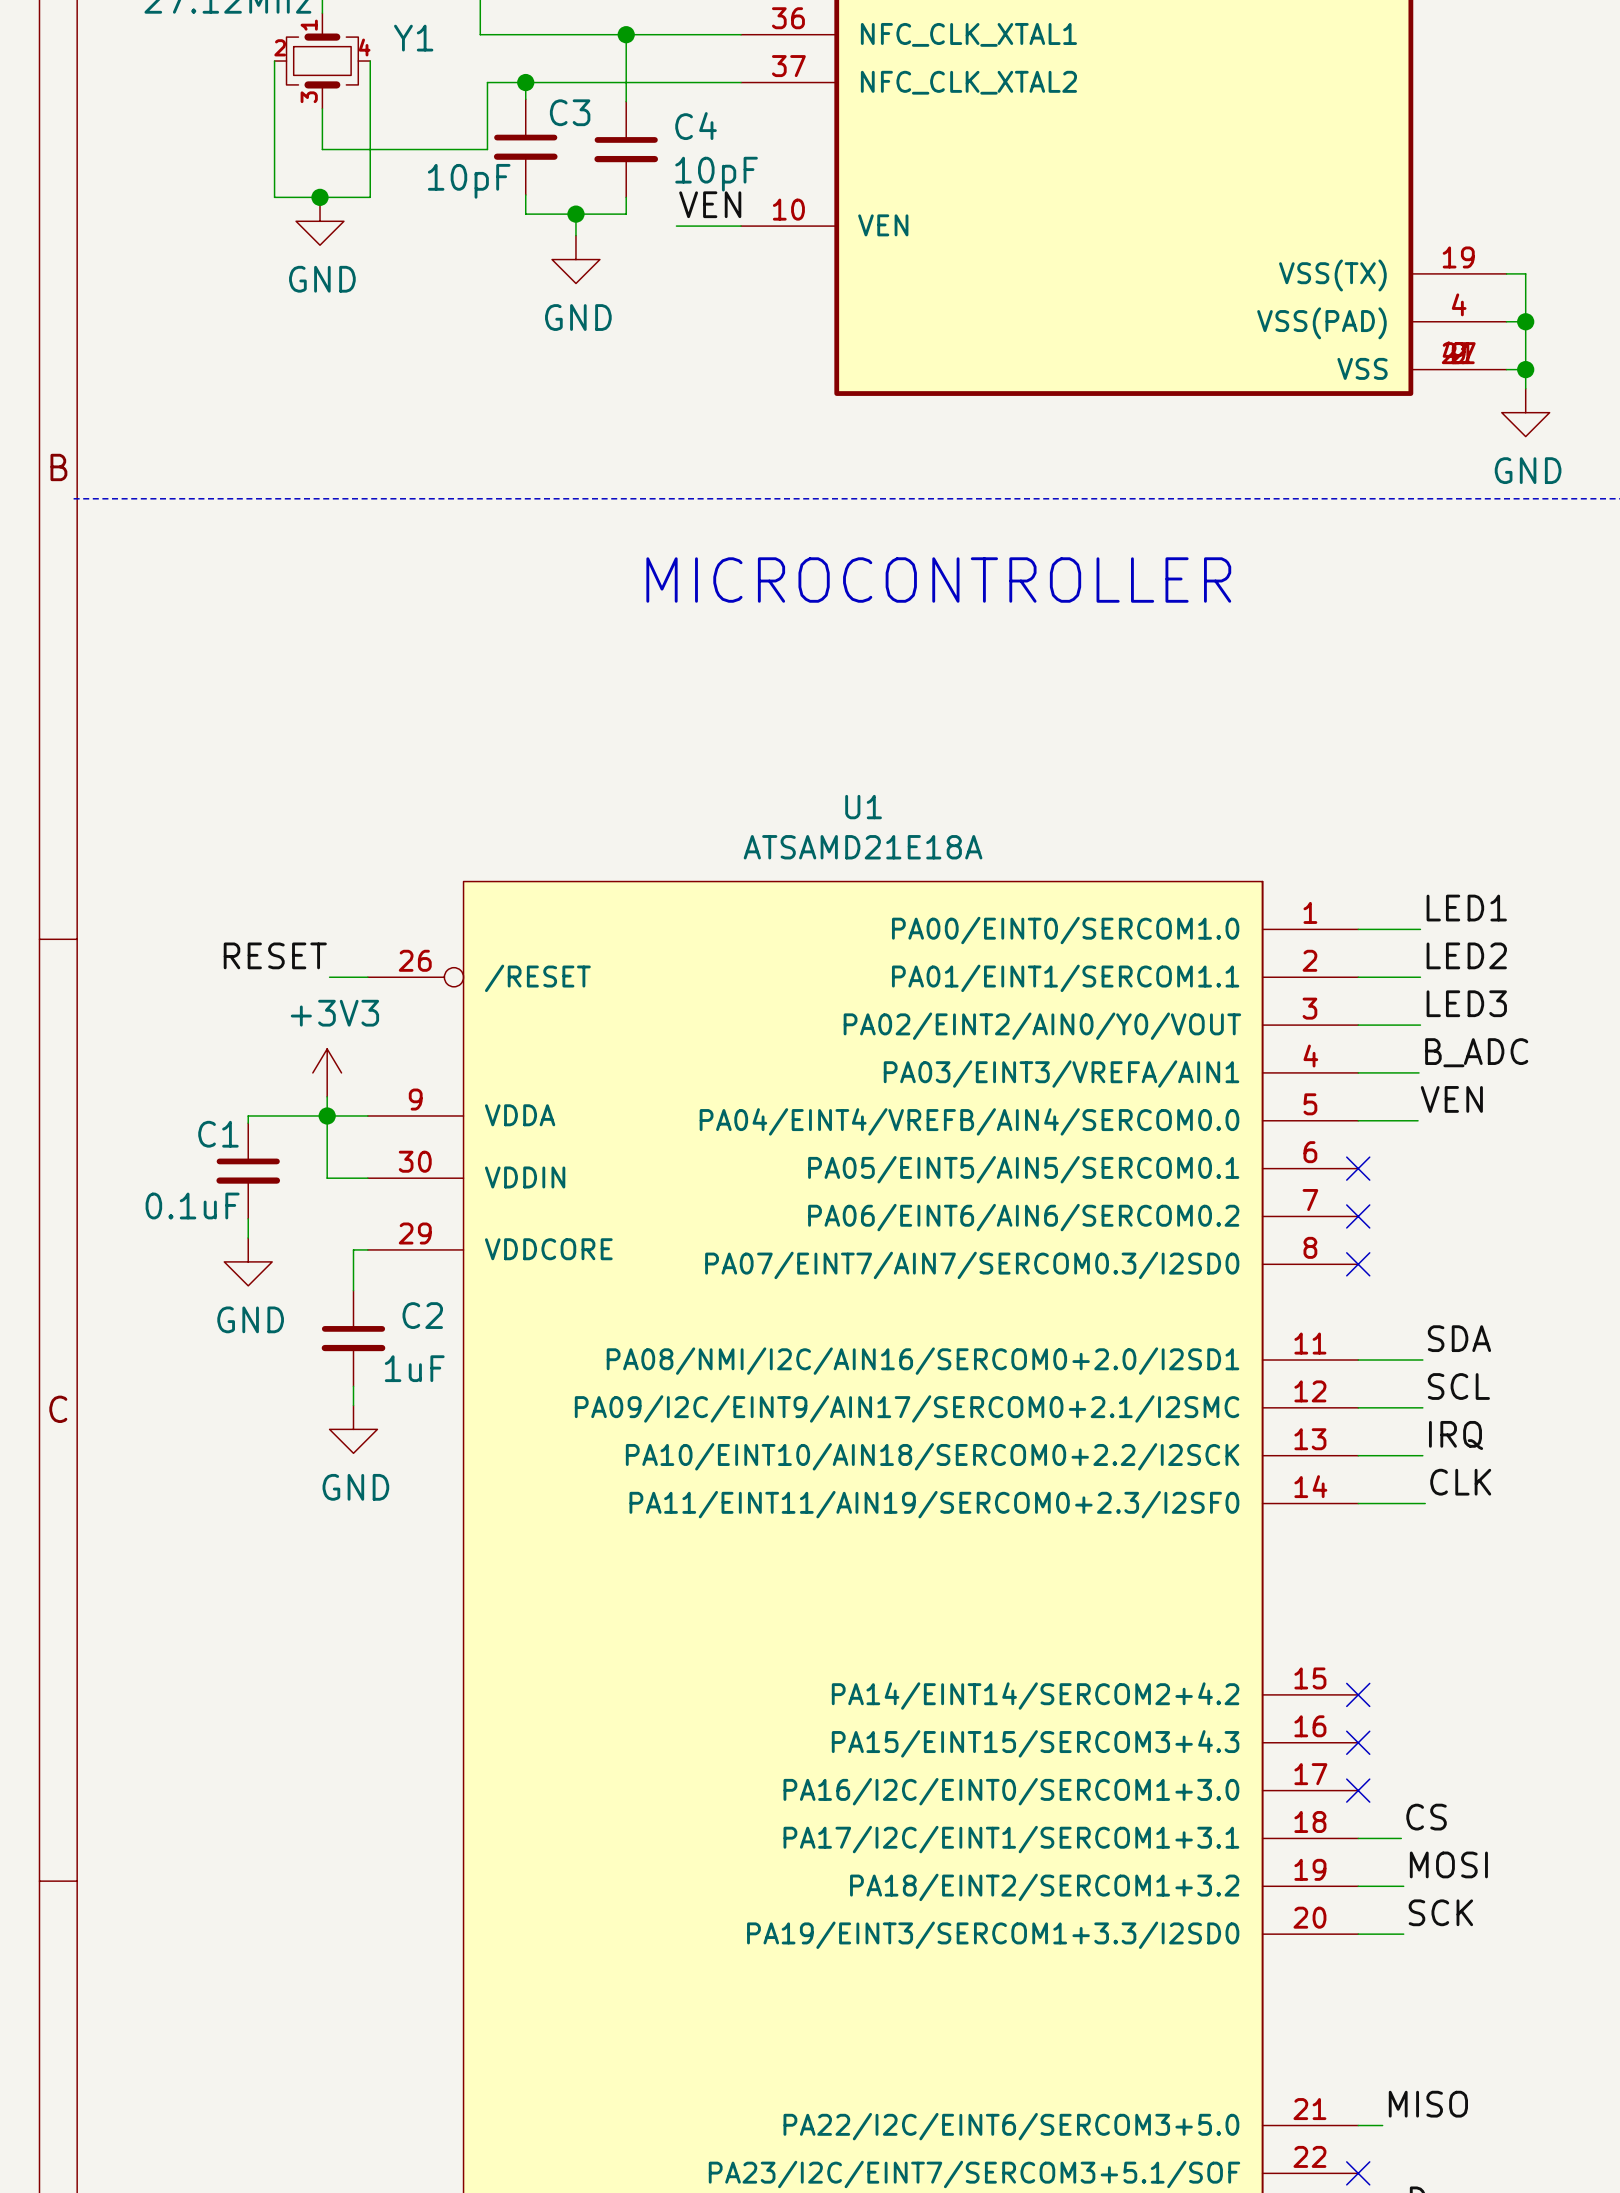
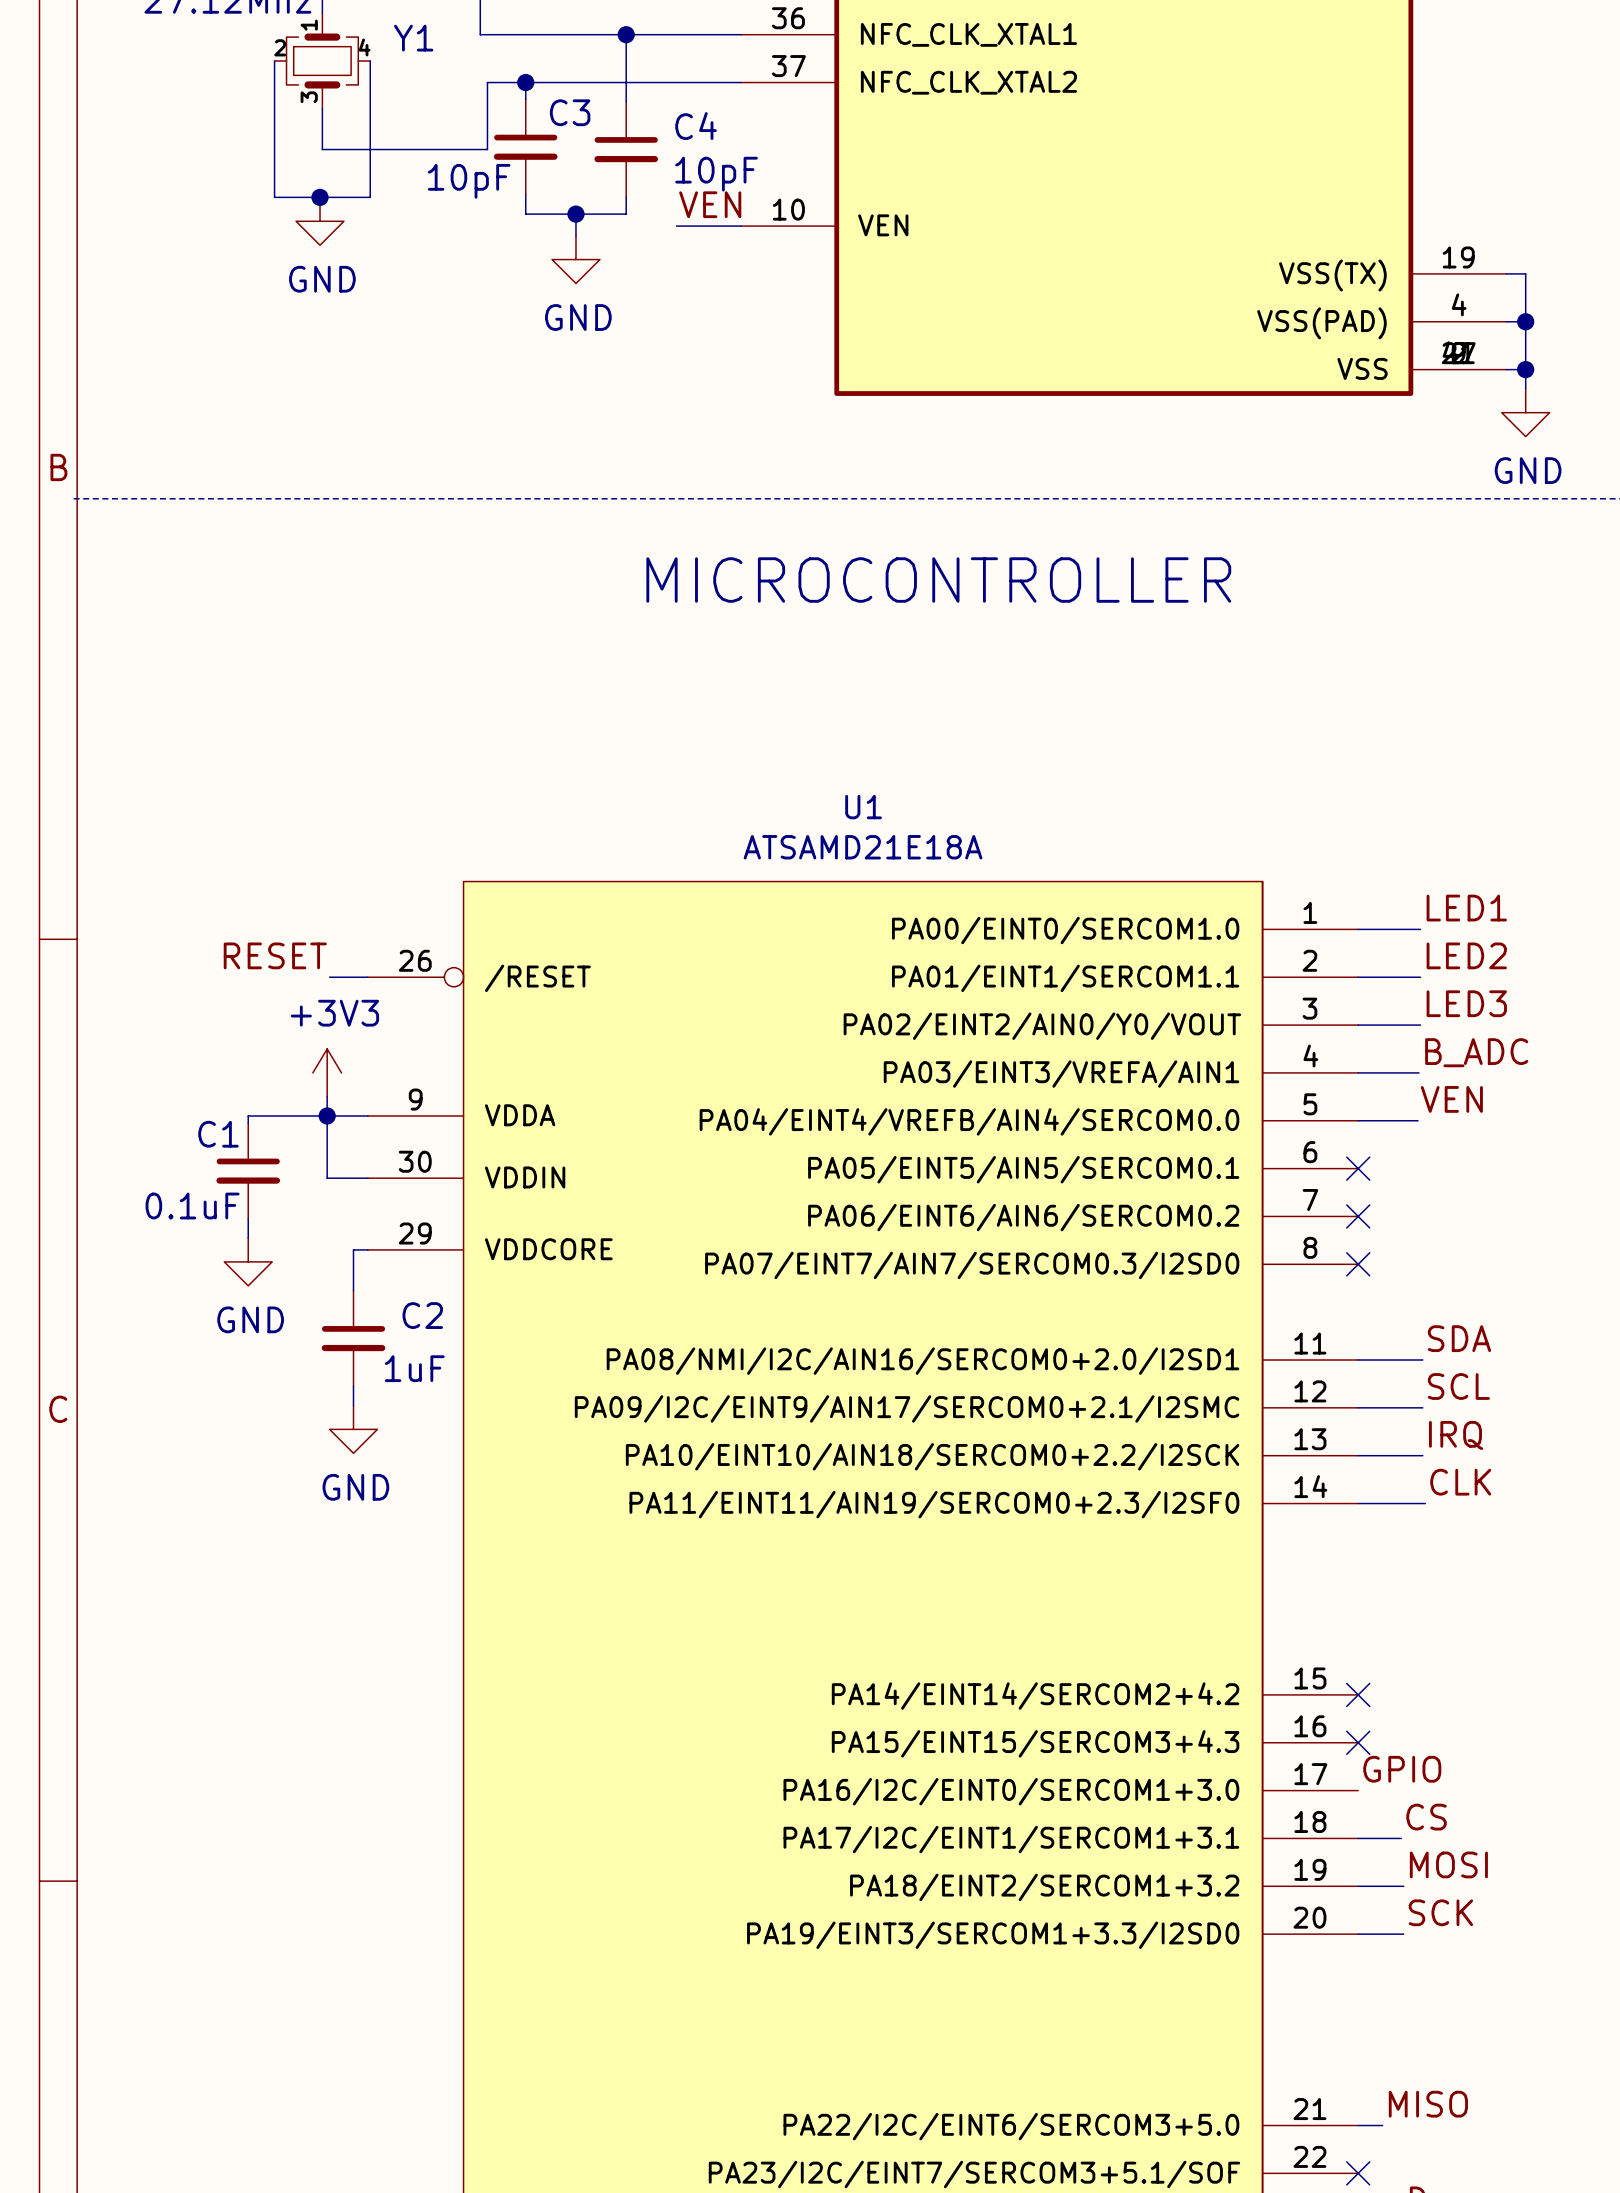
label: none -> GPIO (1402, 1769)
no-connect mark: (1358, 1790) -> none

